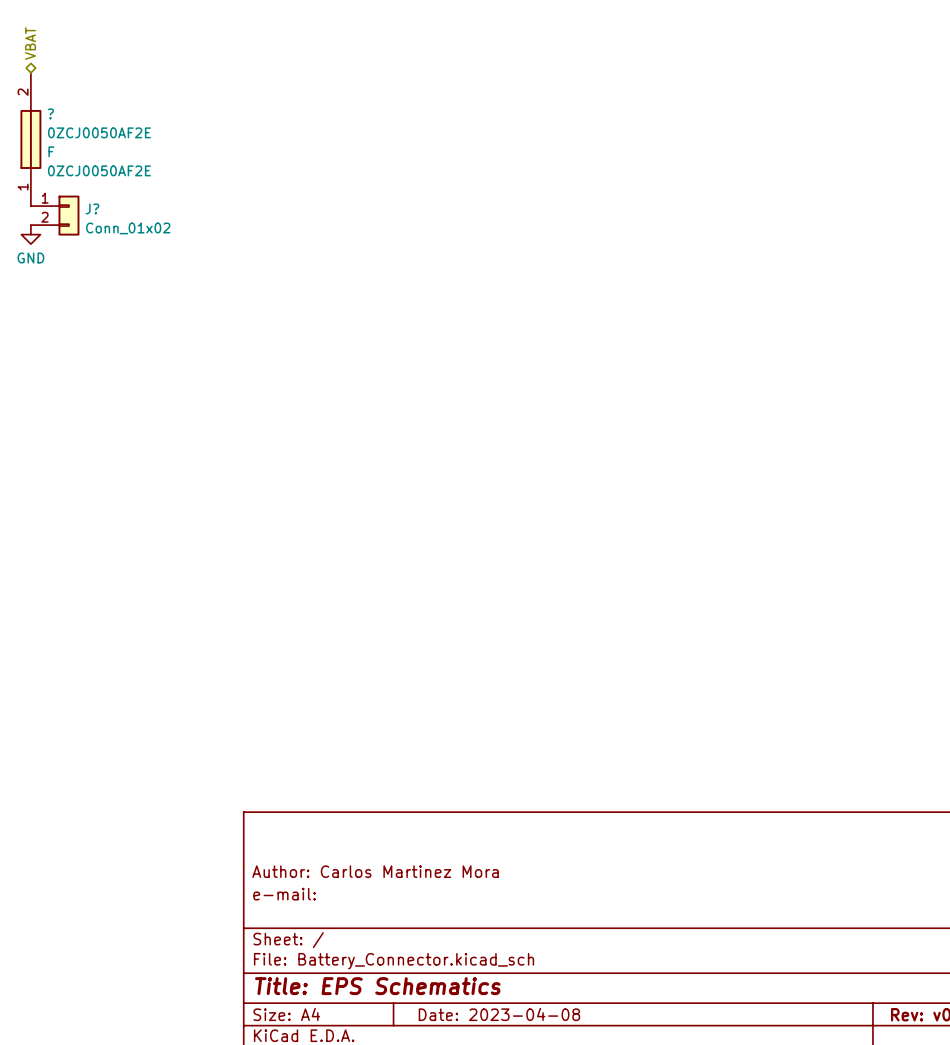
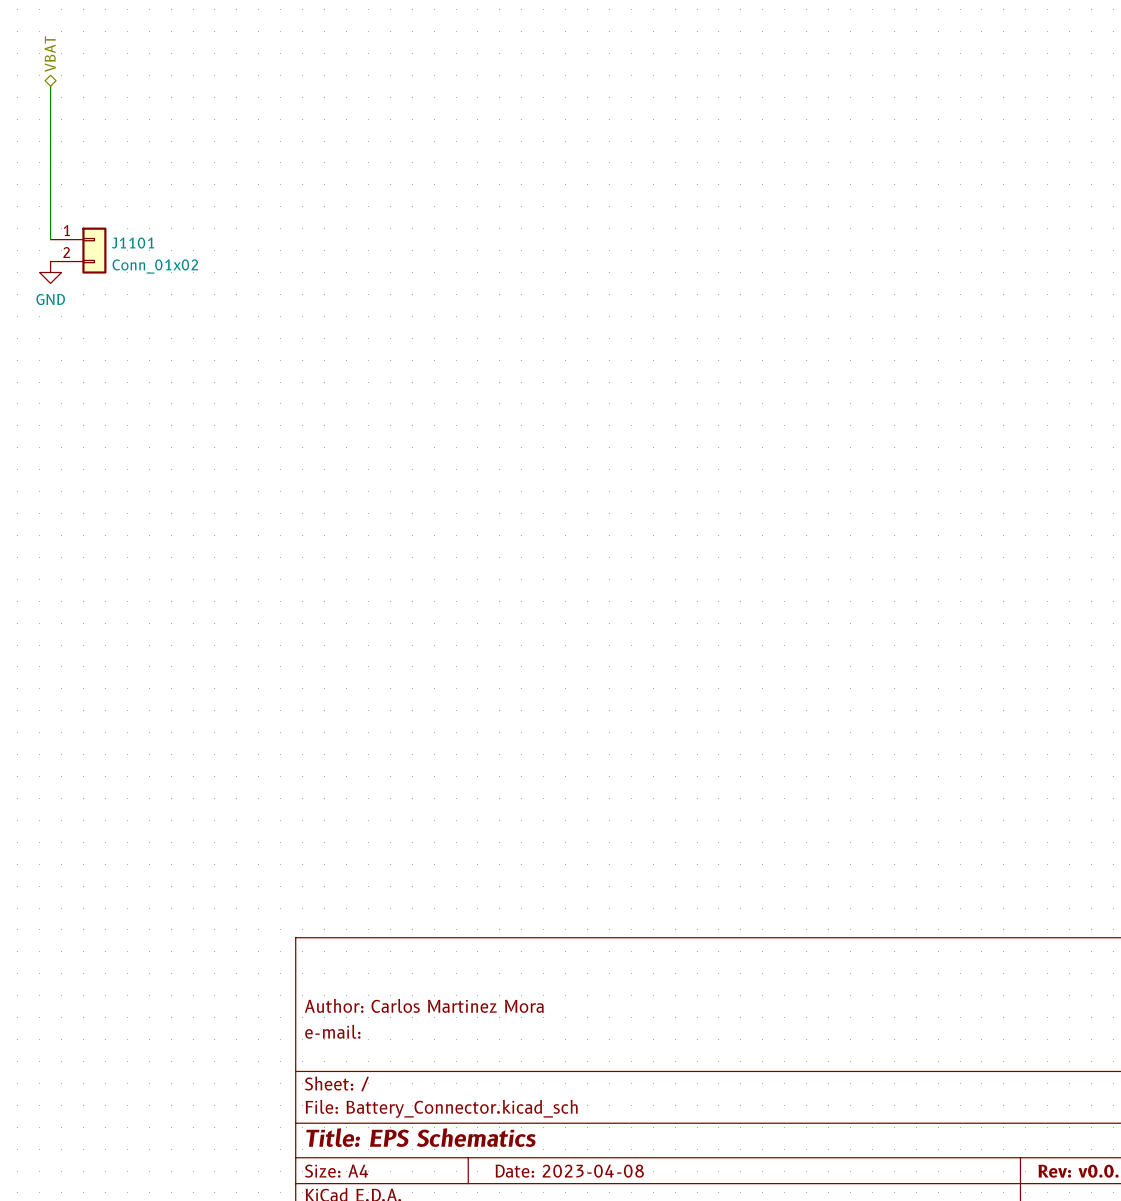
part: 0ZCJ0050AF2E (30, 139) -> none
J? name: J? (92, 208) -> J1101 (133, 243)

